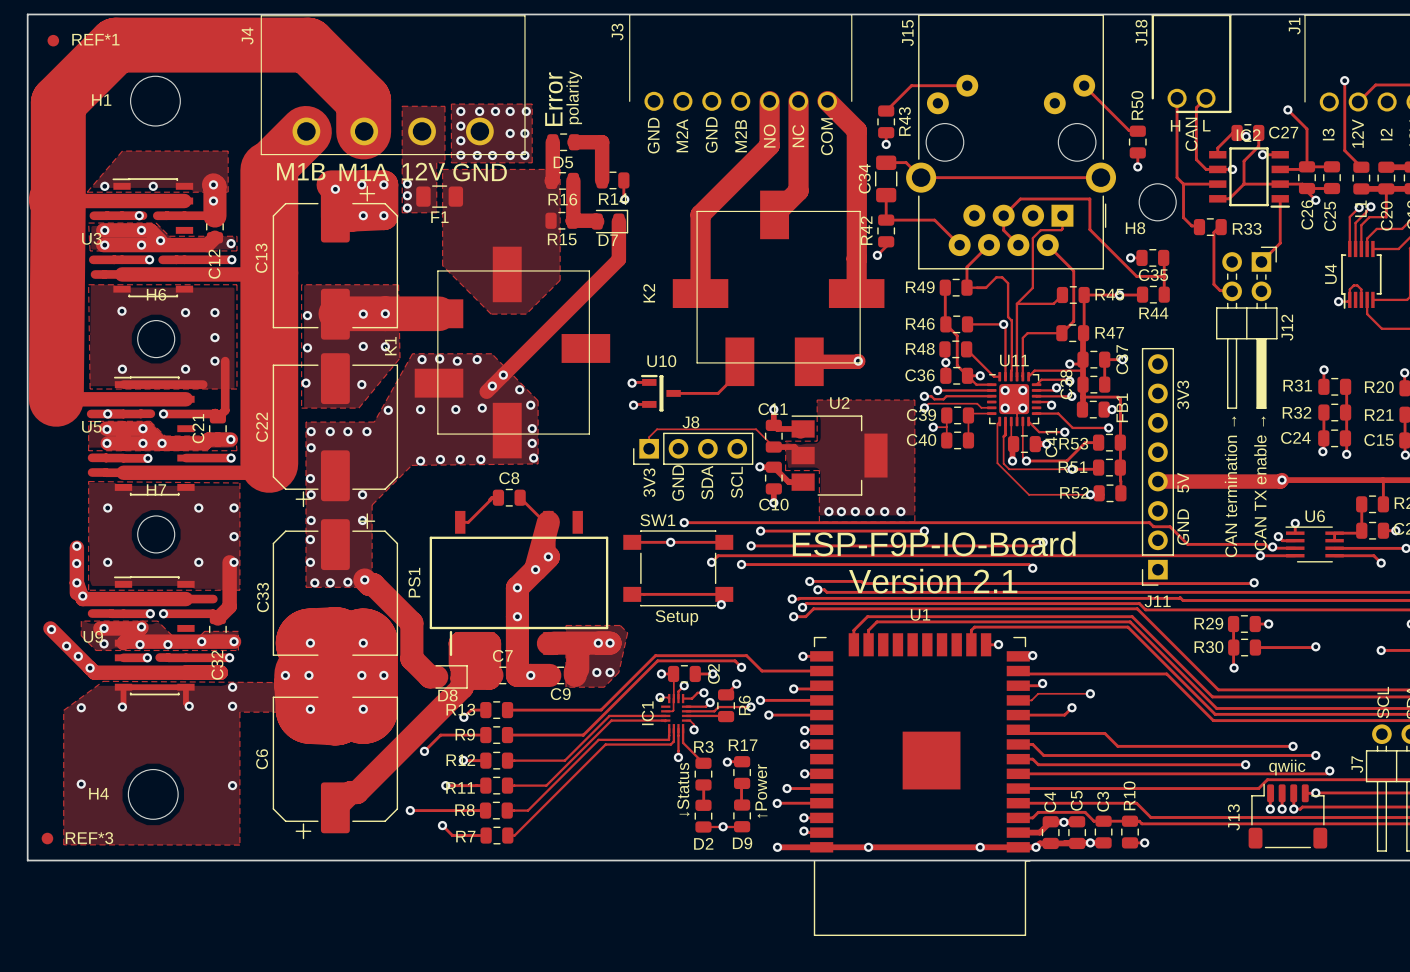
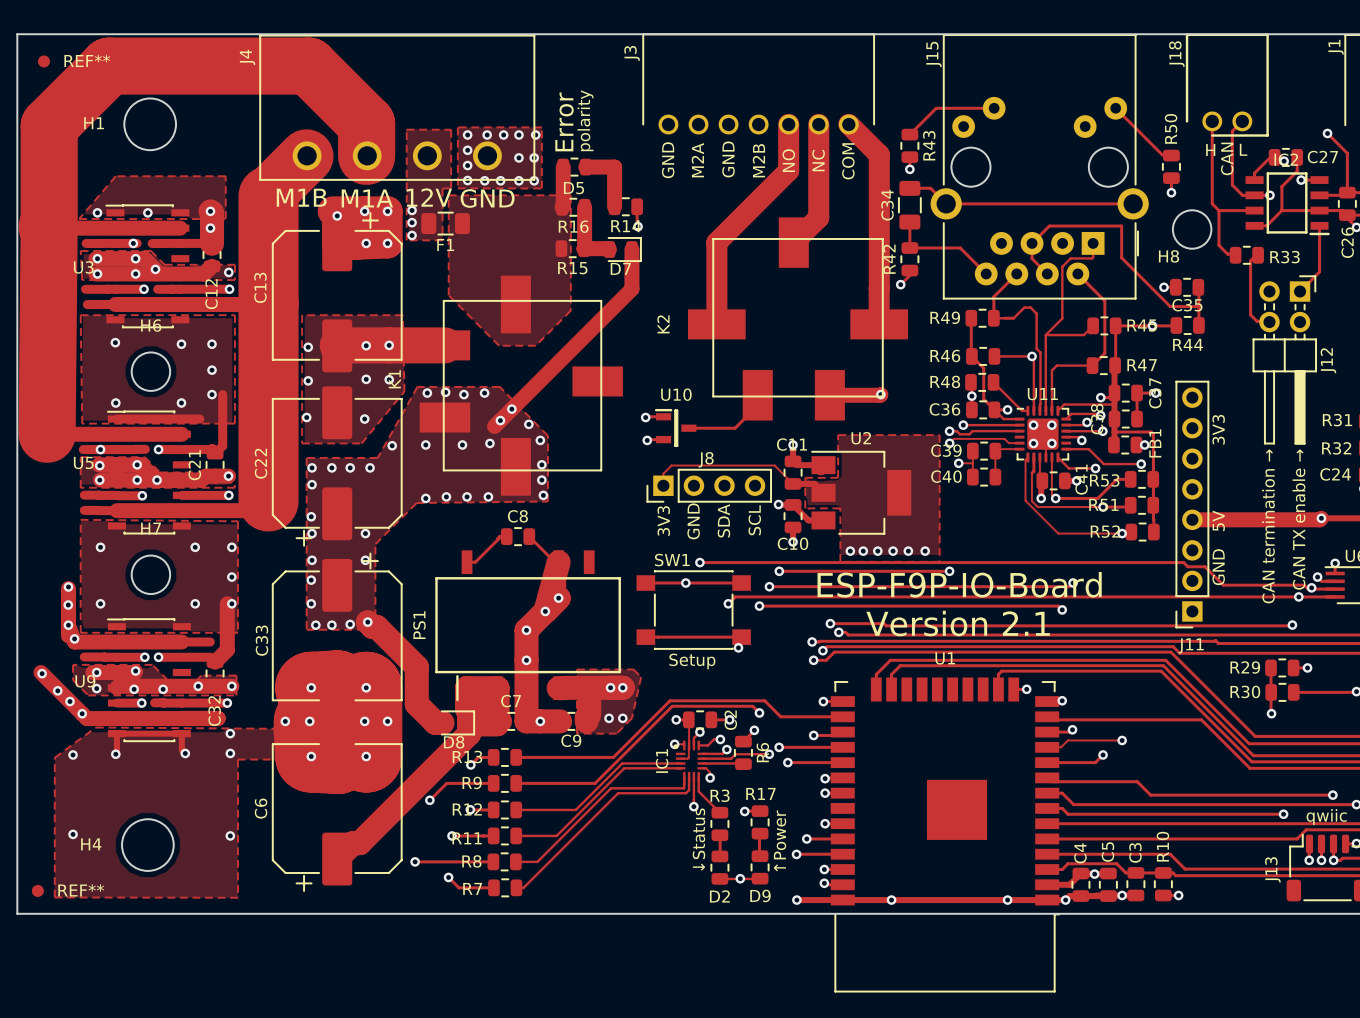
REF*1 name: REF*1 (95, 39) -> REF** (87, 60)
REF*3 name: REF*3 (89, 838) -> REF** (81, 890)

